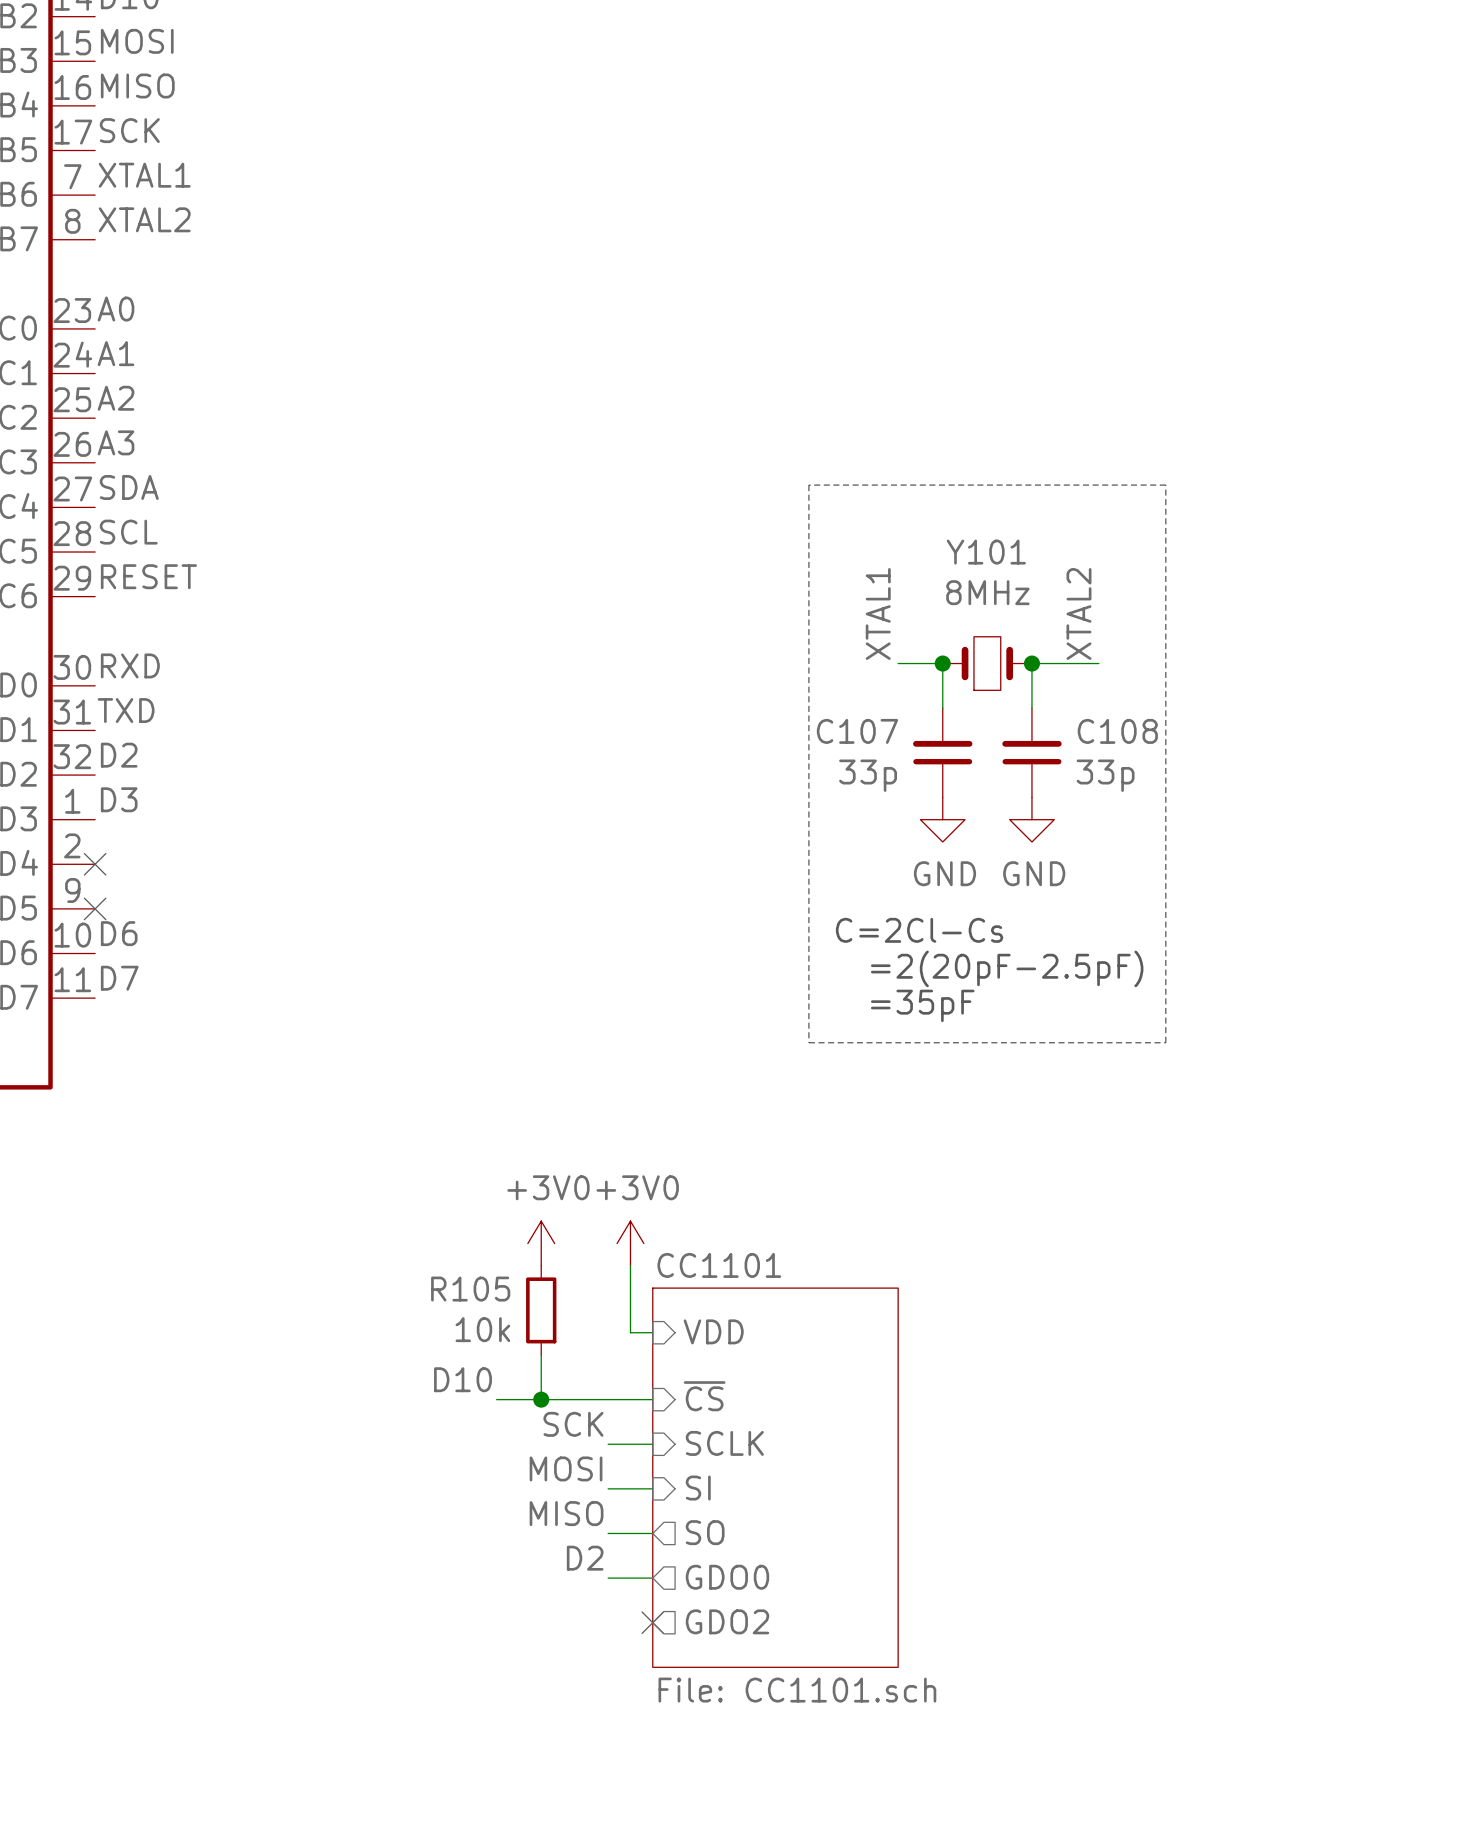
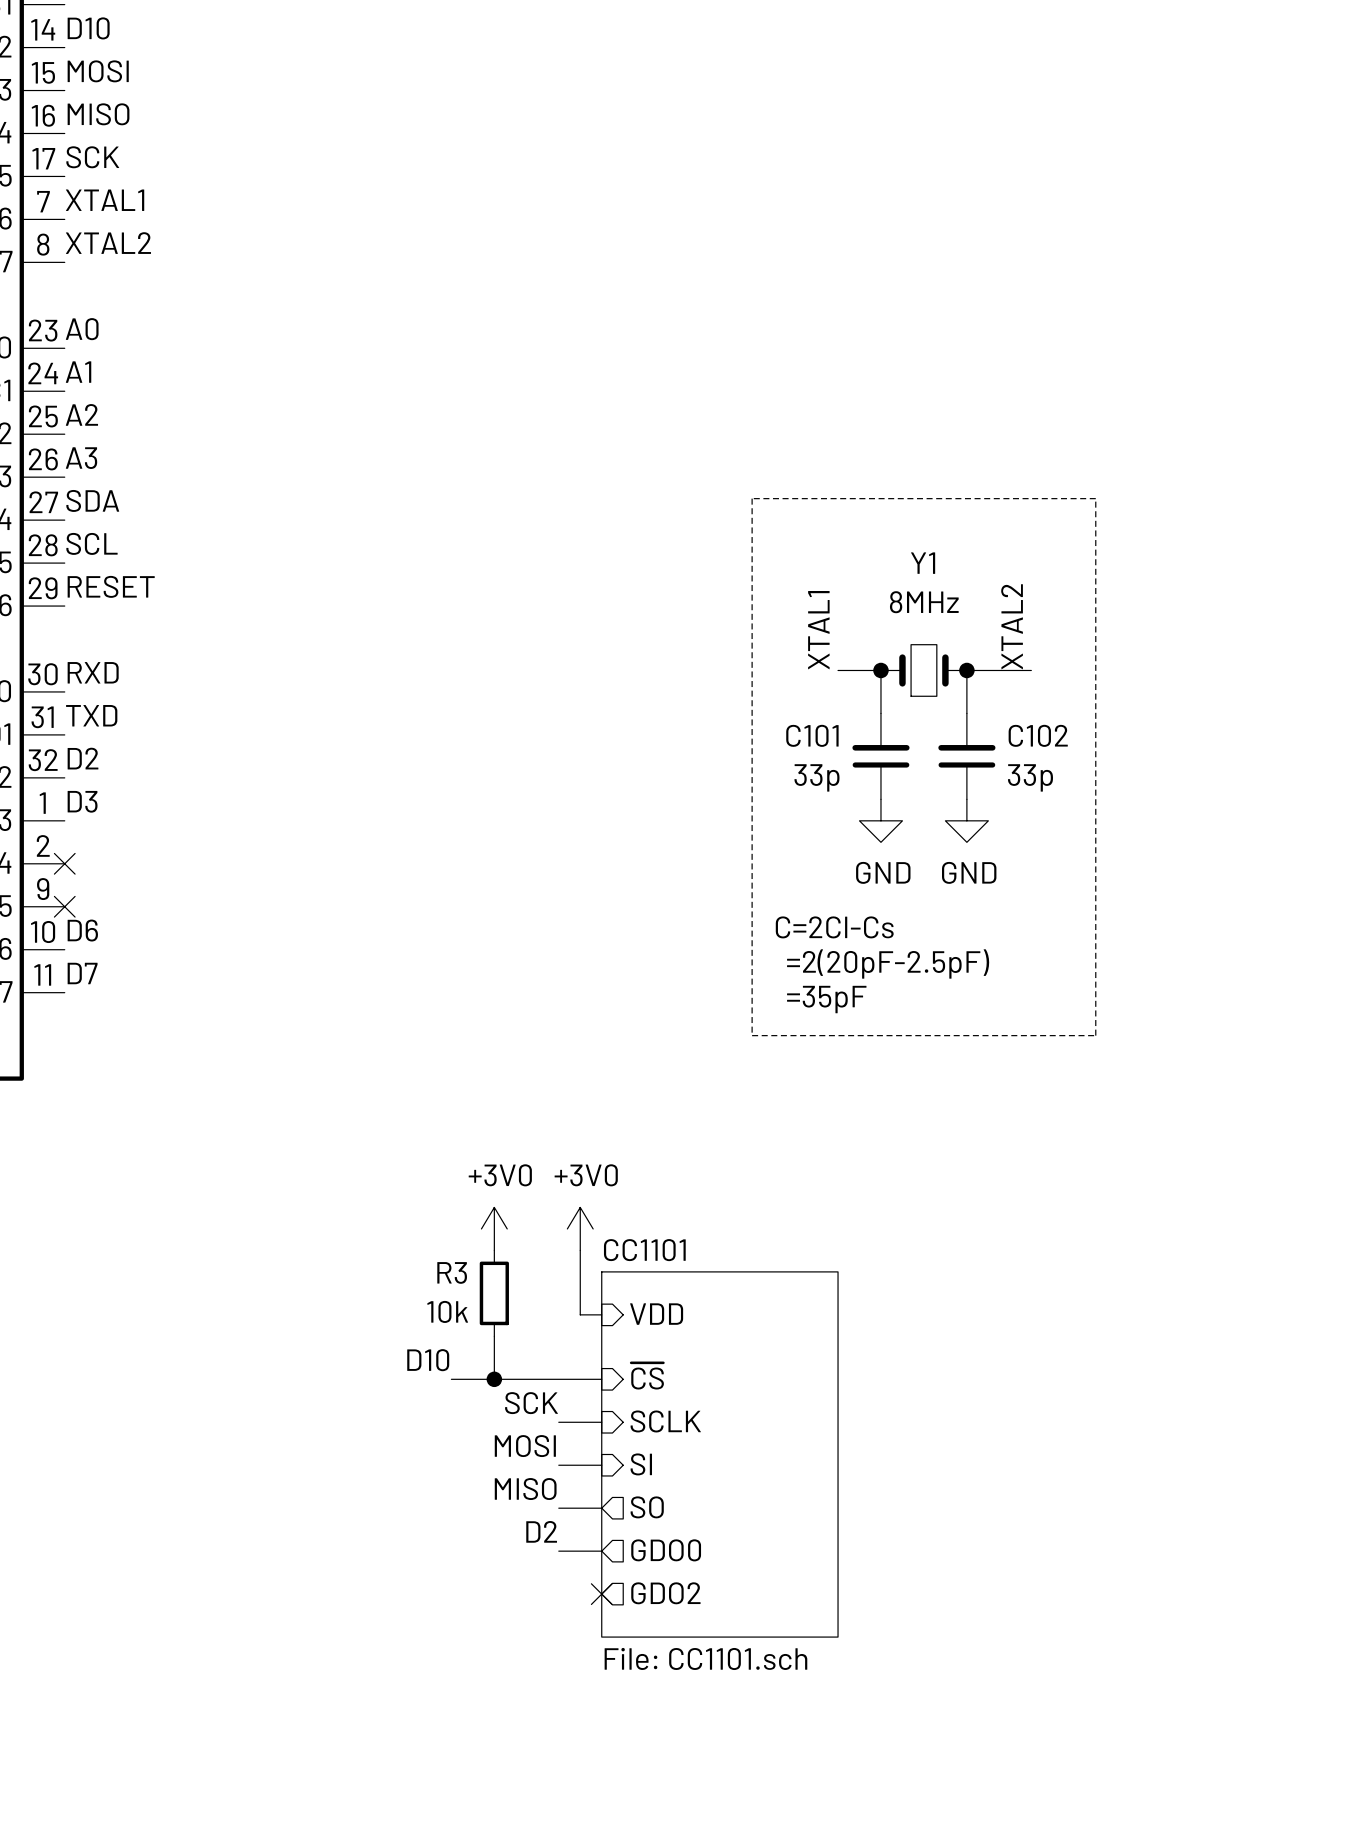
Y101 name: Y101 (986, 552) -> Y1 (923, 563)
C107 name: C107 (857, 731) -> C101 (812, 735)
C108 name: C108 (1117, 731) -> C102 (1038, 735)
R105 name: R105 (470, 1289) -> R3 (452, 1272)

